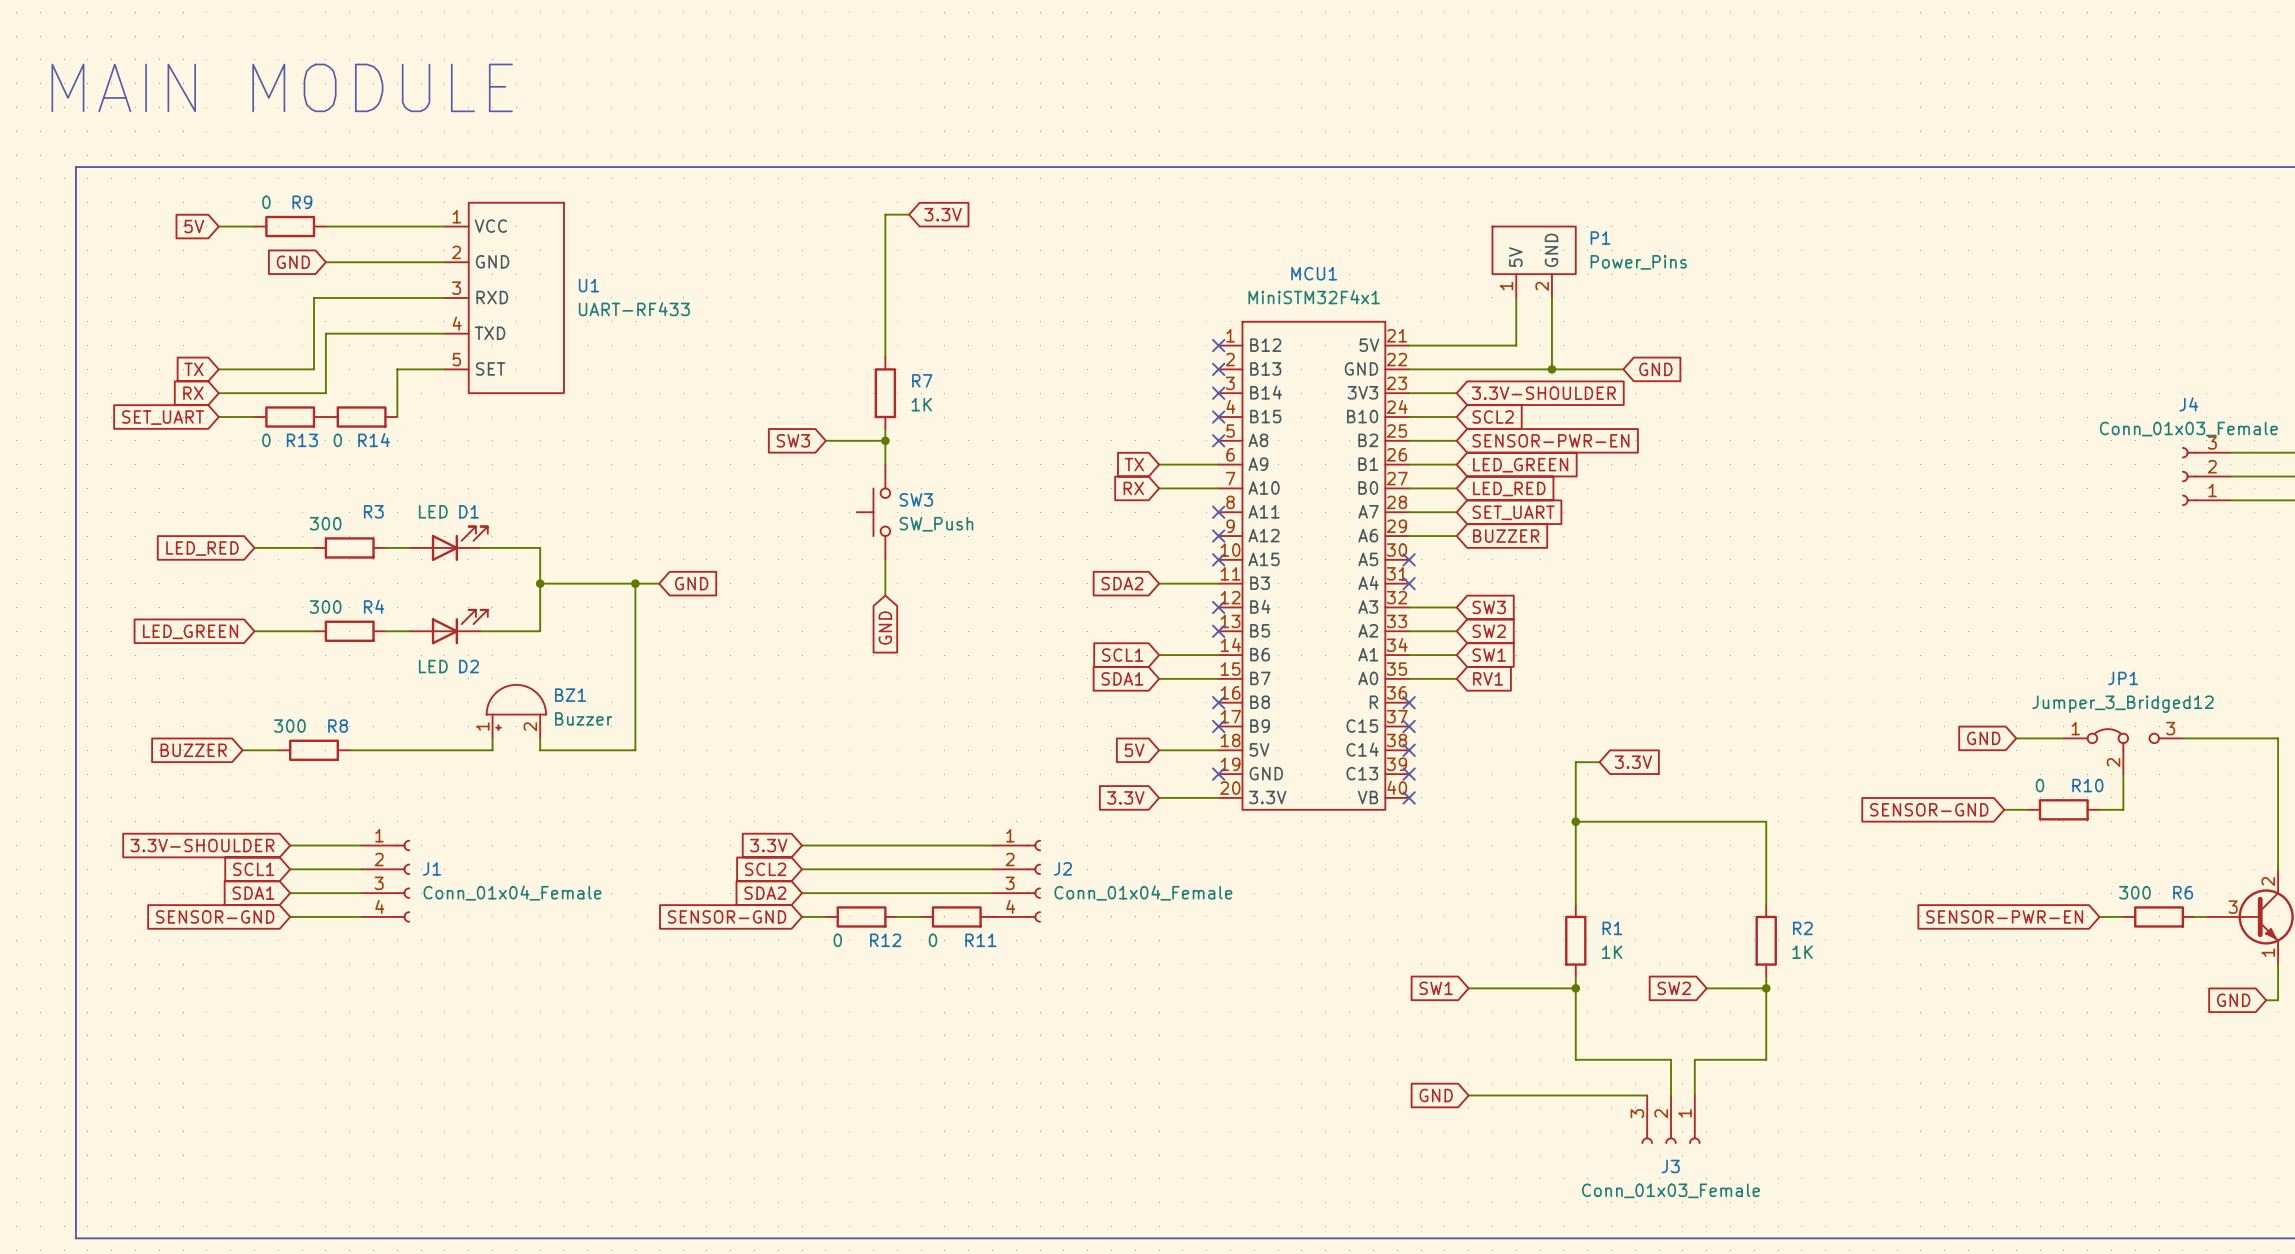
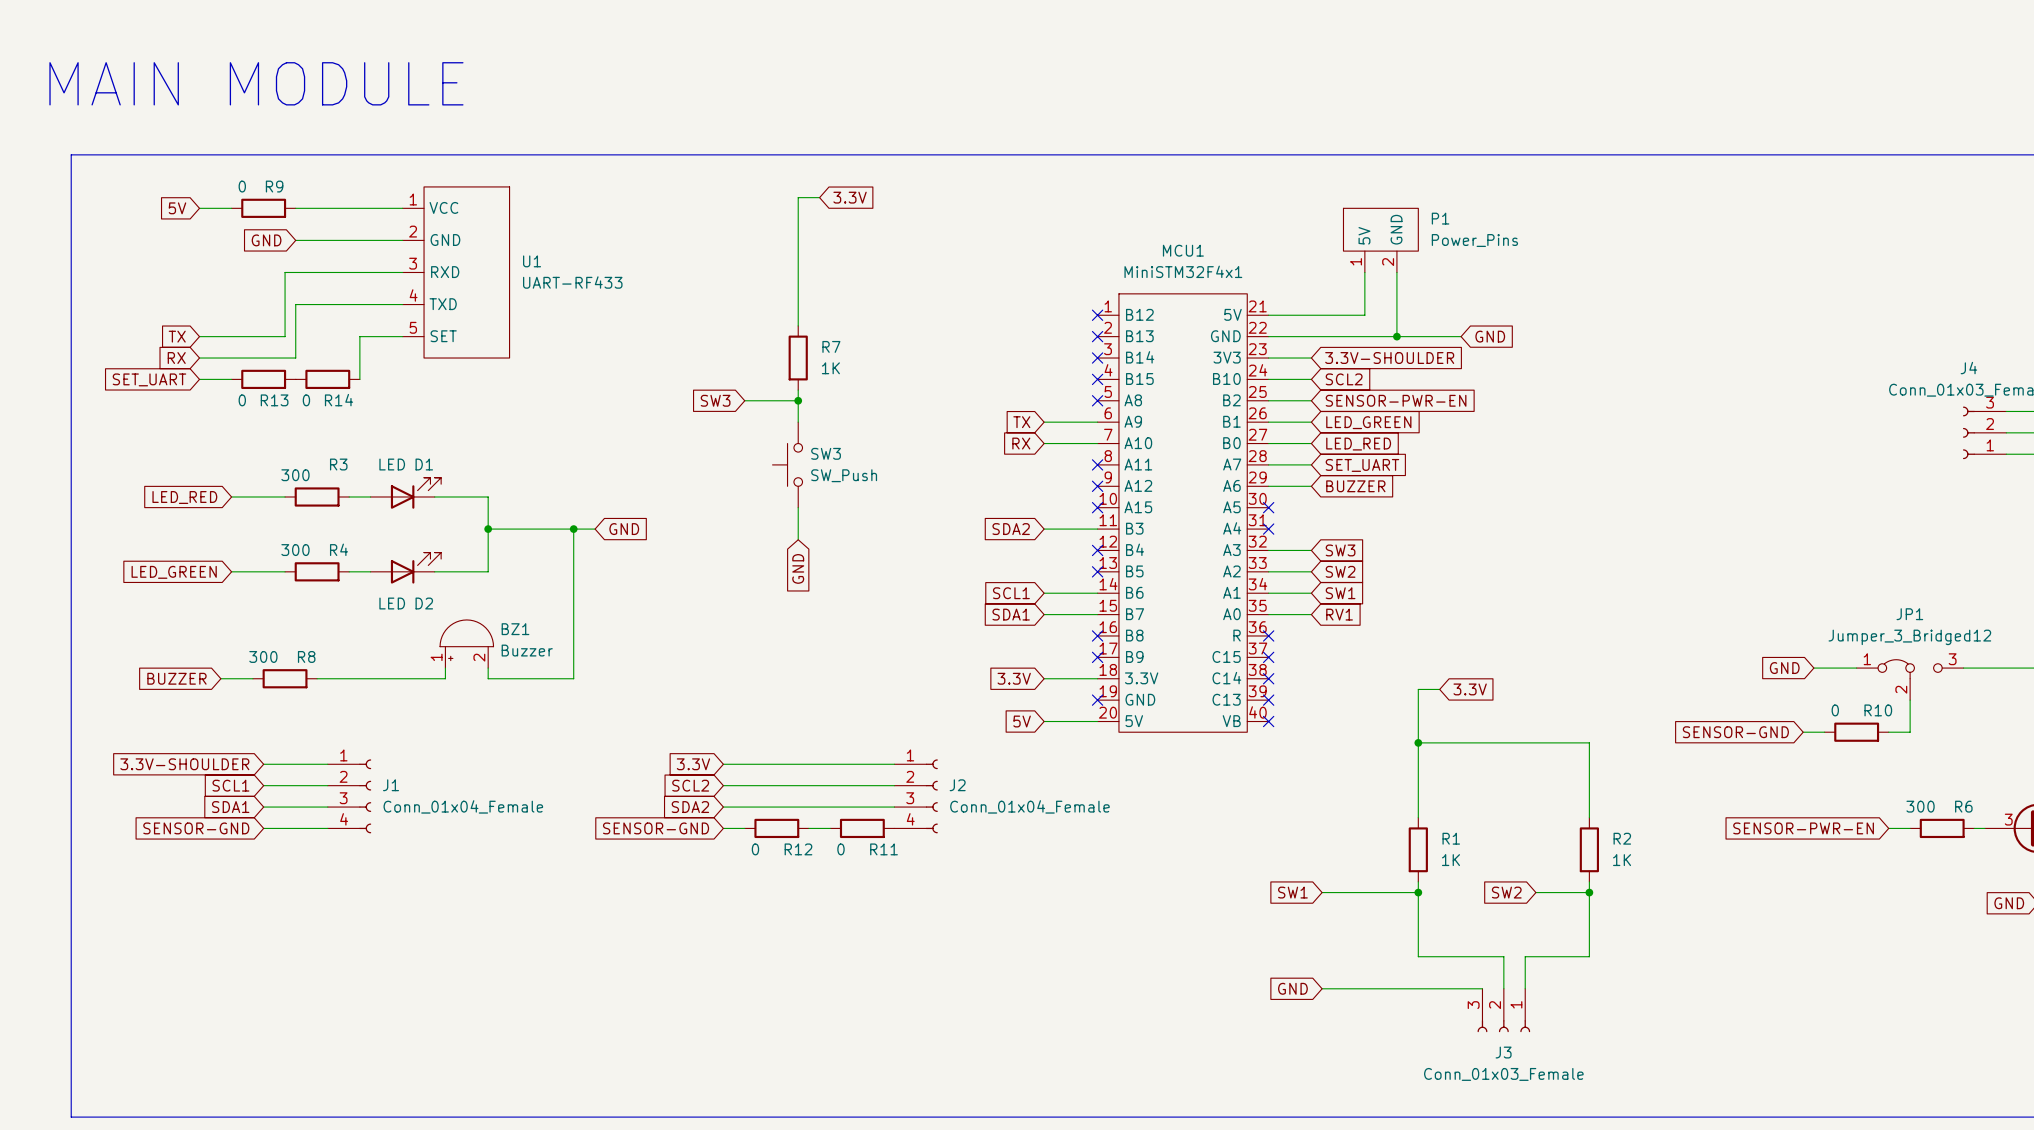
MCU1 pin name: 5V (1259, 749) -> 3.3V (1141, 678)
global label: 5V (1134, 750) -> 3.3V (1014, 678)
global label: 3.3V (1125, 797) -> 5V (1022, 721)
MCU1 pin name: 3.3V (1267, 797) -> 5V (1134, 721)

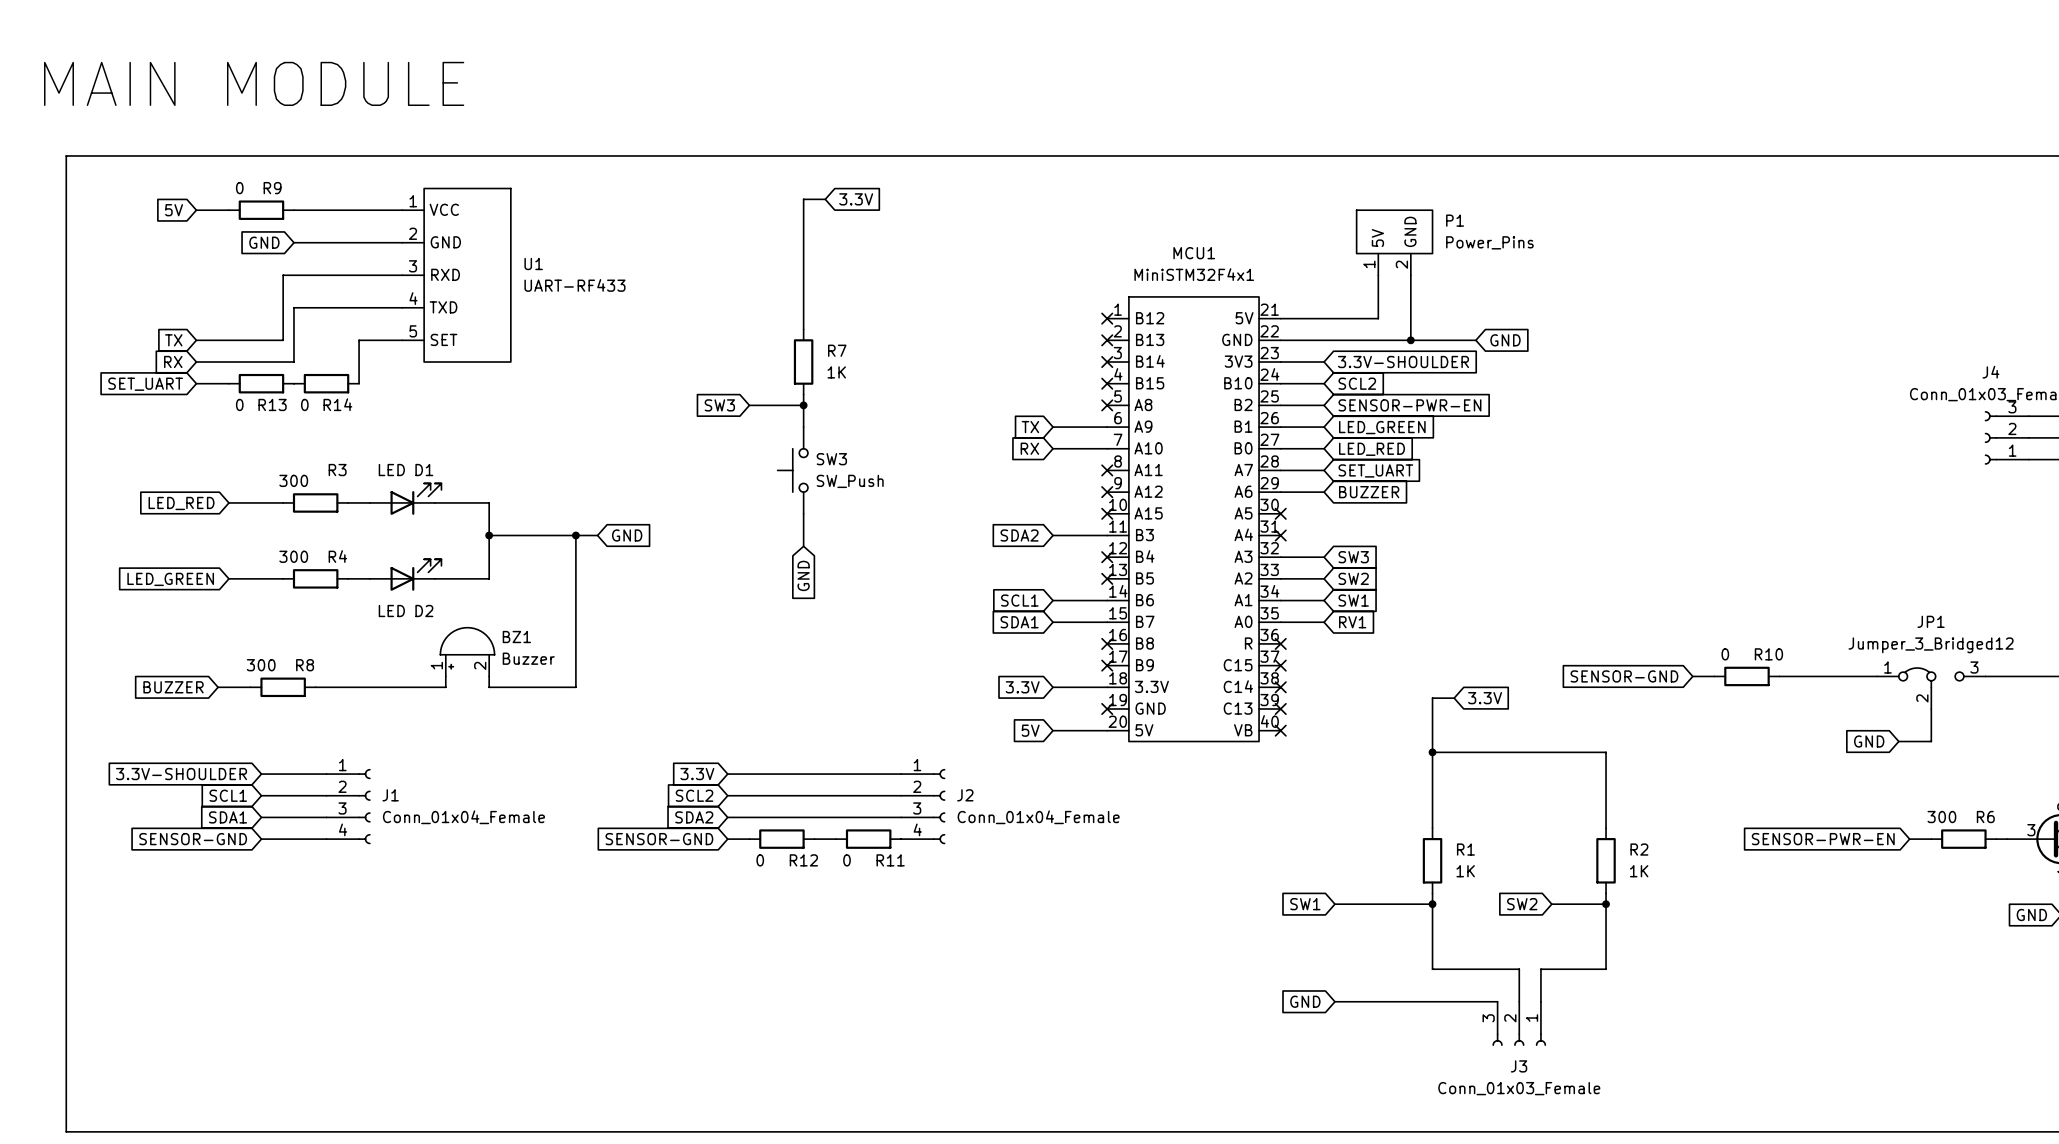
wire: none -> (1779, 676) (1833, 676)
global label position: GND (1784, 668) -> GND (1869, 741)
global label position: SENSOR-GND (1735, 732) -> SENSOR-GND (1624, 676)
wire: (1803, 732) (1824, 732) -> (1692, 676) (1714, 676)
R10 position: (1856, 732) -> (1746, 676)

